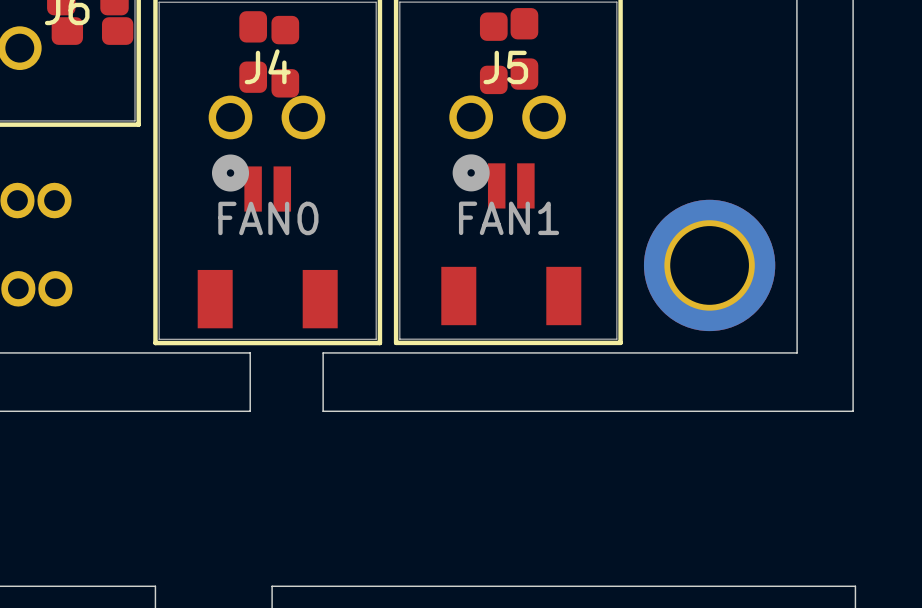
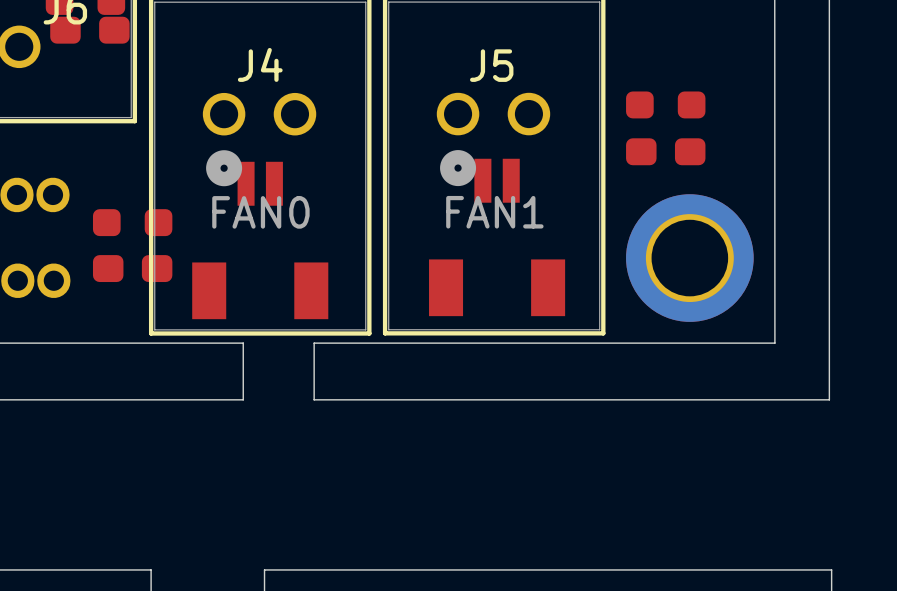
part rotation: 0° (524, 48) -> 90° clockwise (665, 151)
part position: (524, 48) -> (665, 151)
part: (253, 52) -> none
part rotation: 0° (493, 53) -> 90° clockwise (665, 104)
part position: (493, 53) -> (665, 104)
part: (285, 56) -> none
part: none -> (132, 222)
part: none -> (132, 268)

